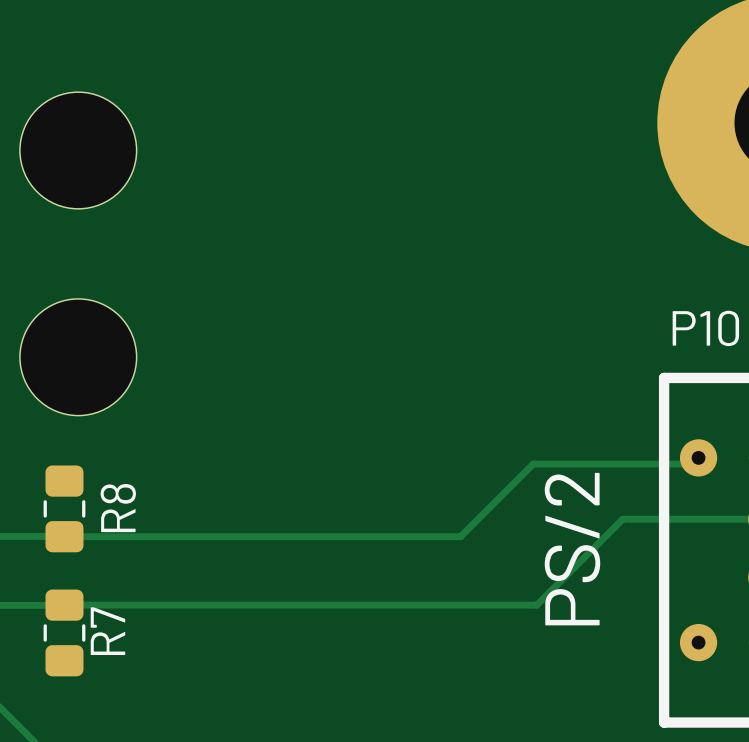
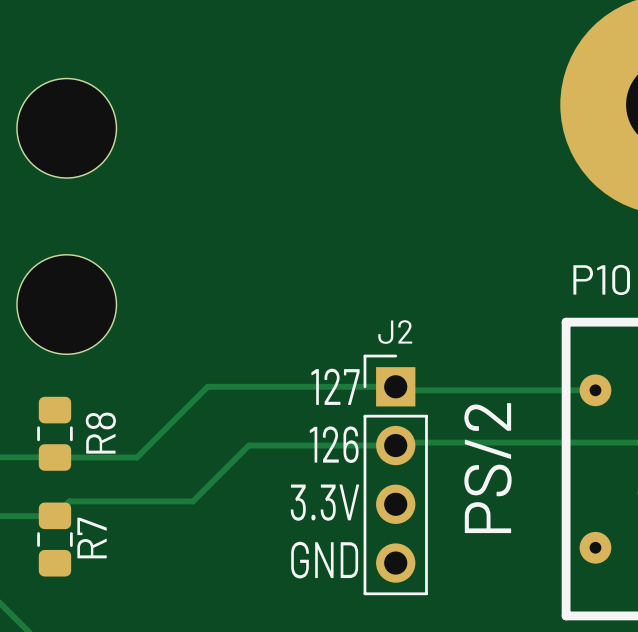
text: none -> 127 (335, 386)
track: (698, 464) (533, 464) (460, 536) (160, 536) -> (595, 390) (399, 390) (395, 386) (207, 386) (137, 457)
track: (622, 519) (536, 605) (64, 605) -> (530, 442) (398, 442) (395, 445) (248, 445) (192, 501) (69, 501) (54, 515)
text: none -> 126 (334, 444)
J2: none -> (395, 474)
text: none -> 3.3V (324, 502)
text: none -> GND (324, 560)

